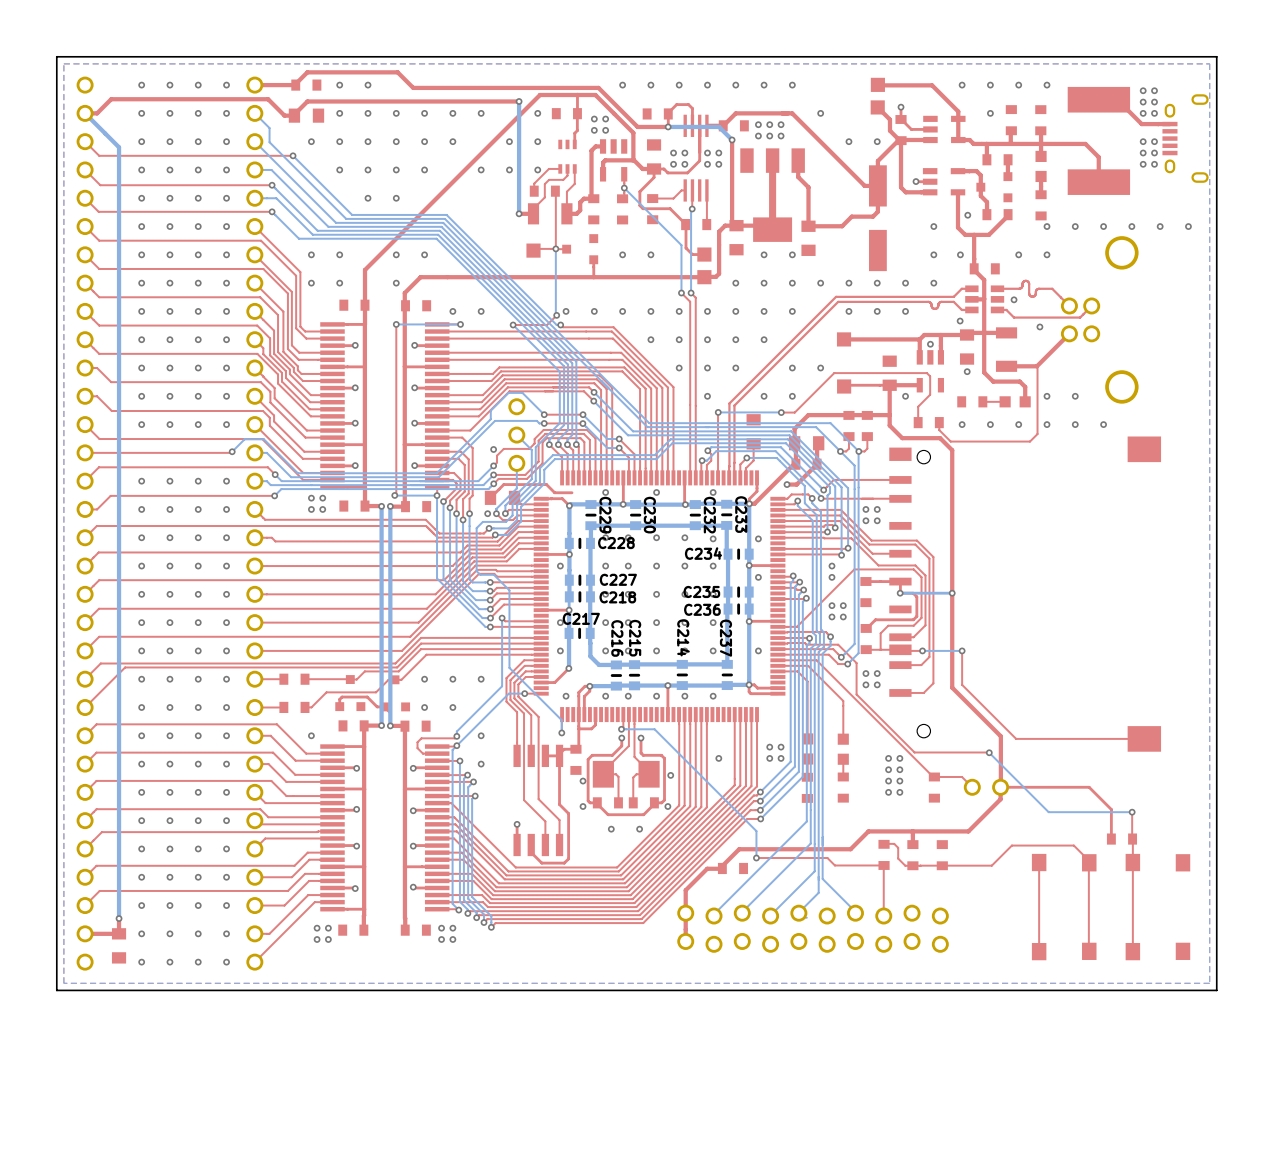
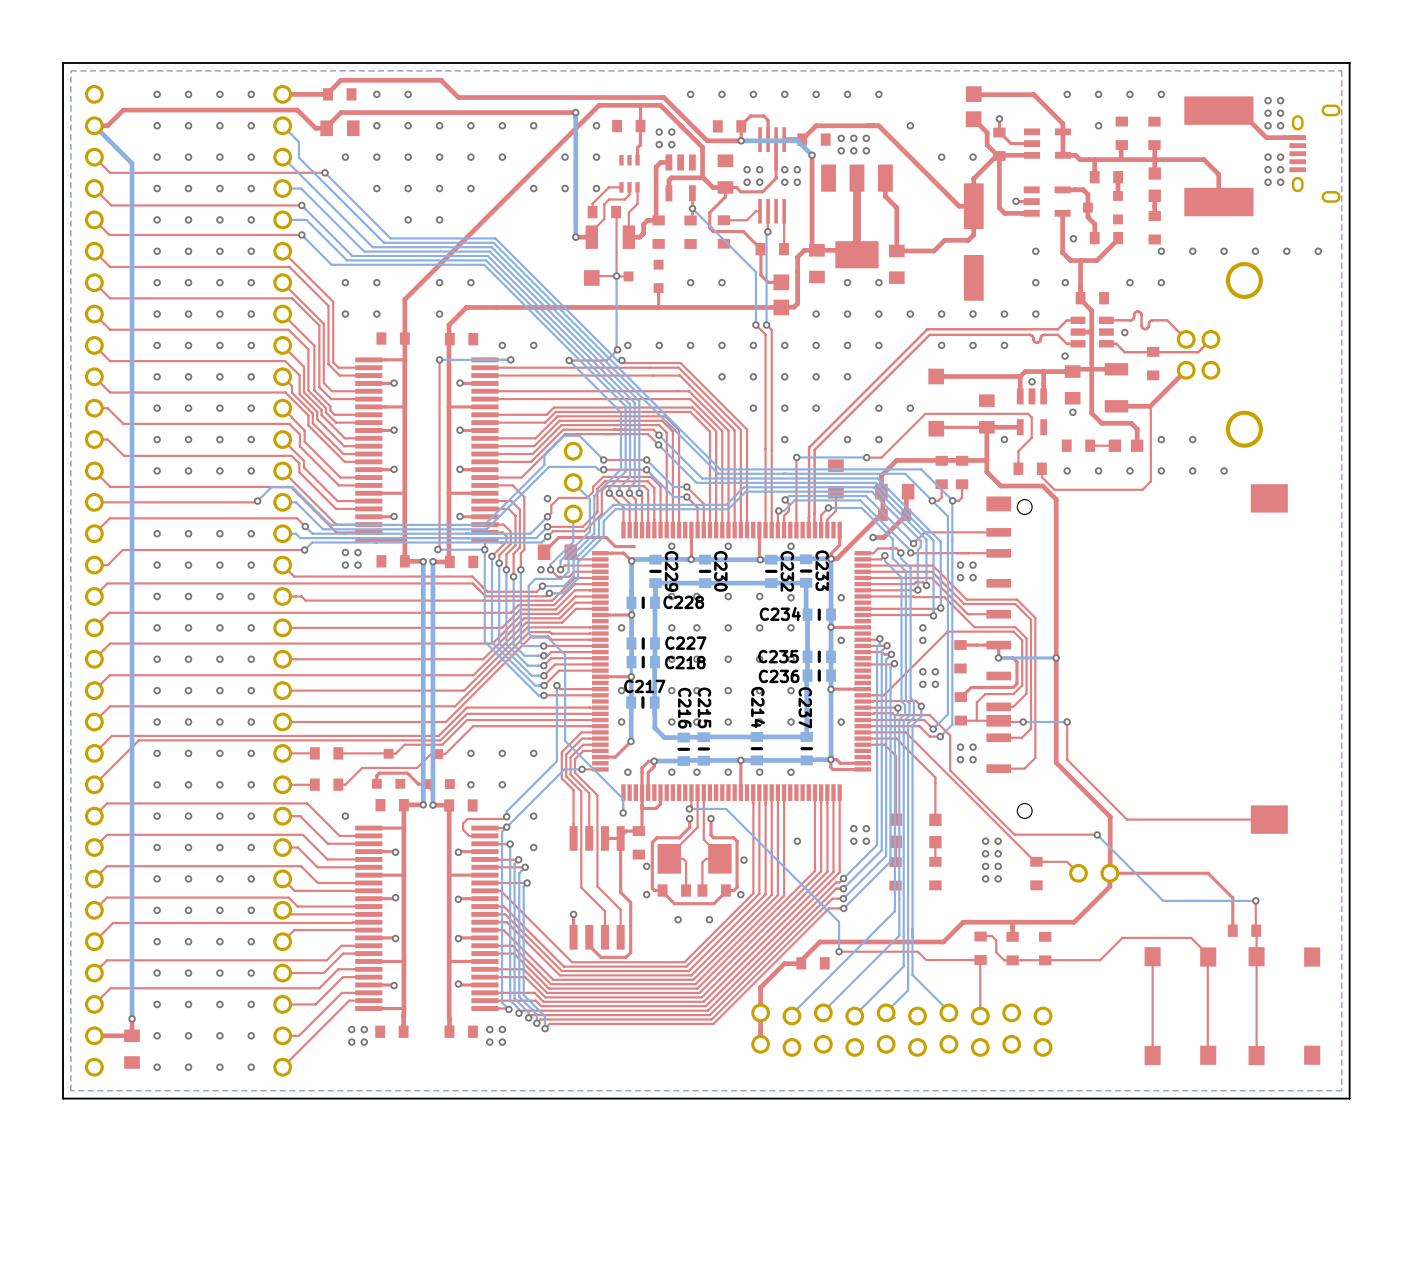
via: (1039, 326) -> none
part: none -> (1153, 363)

